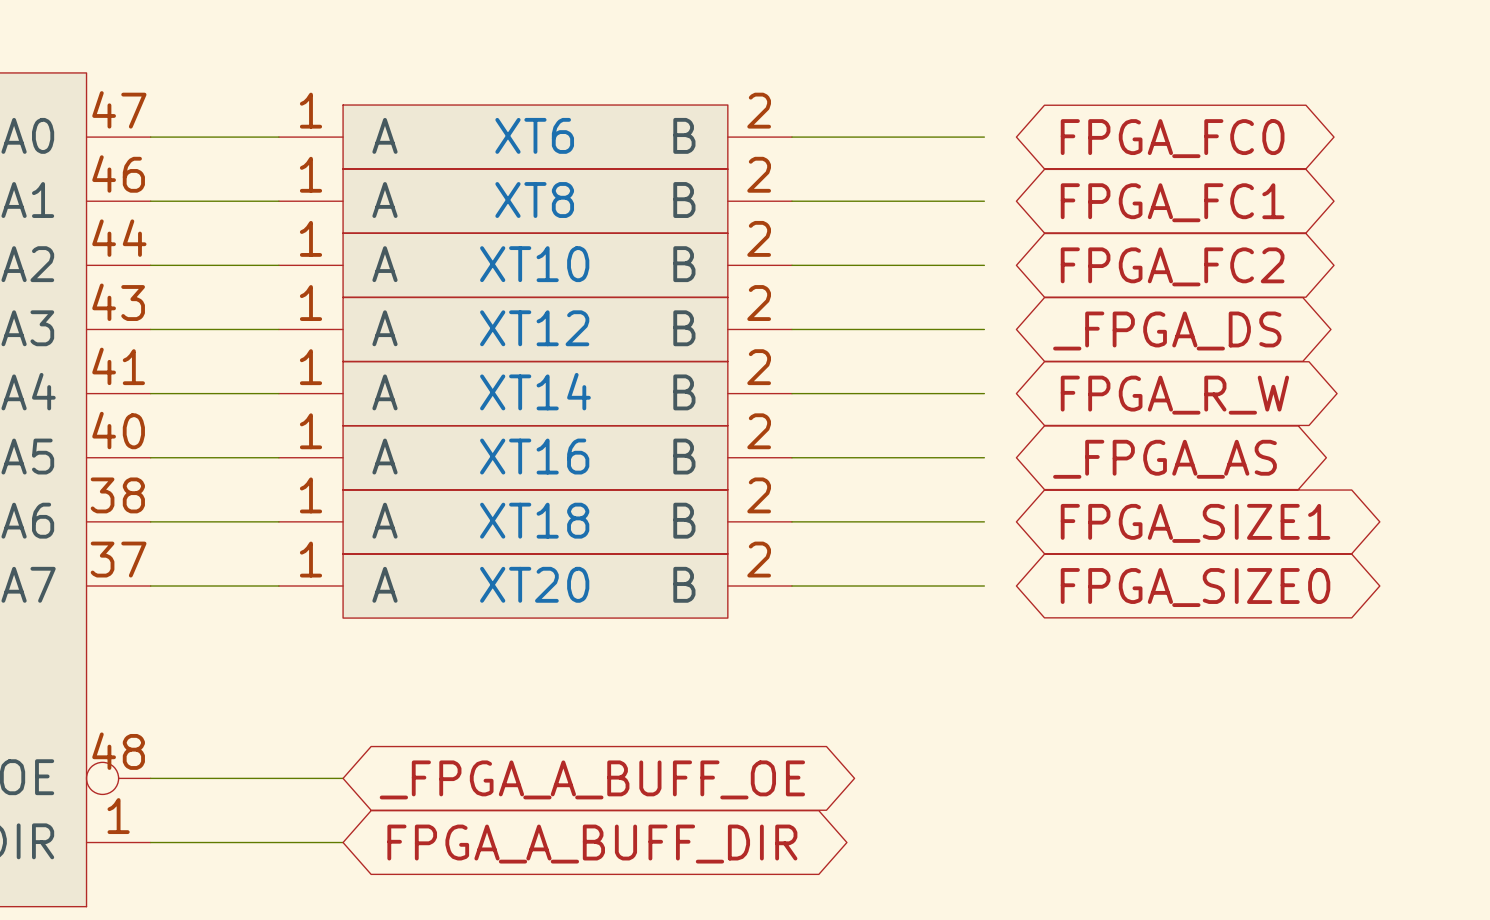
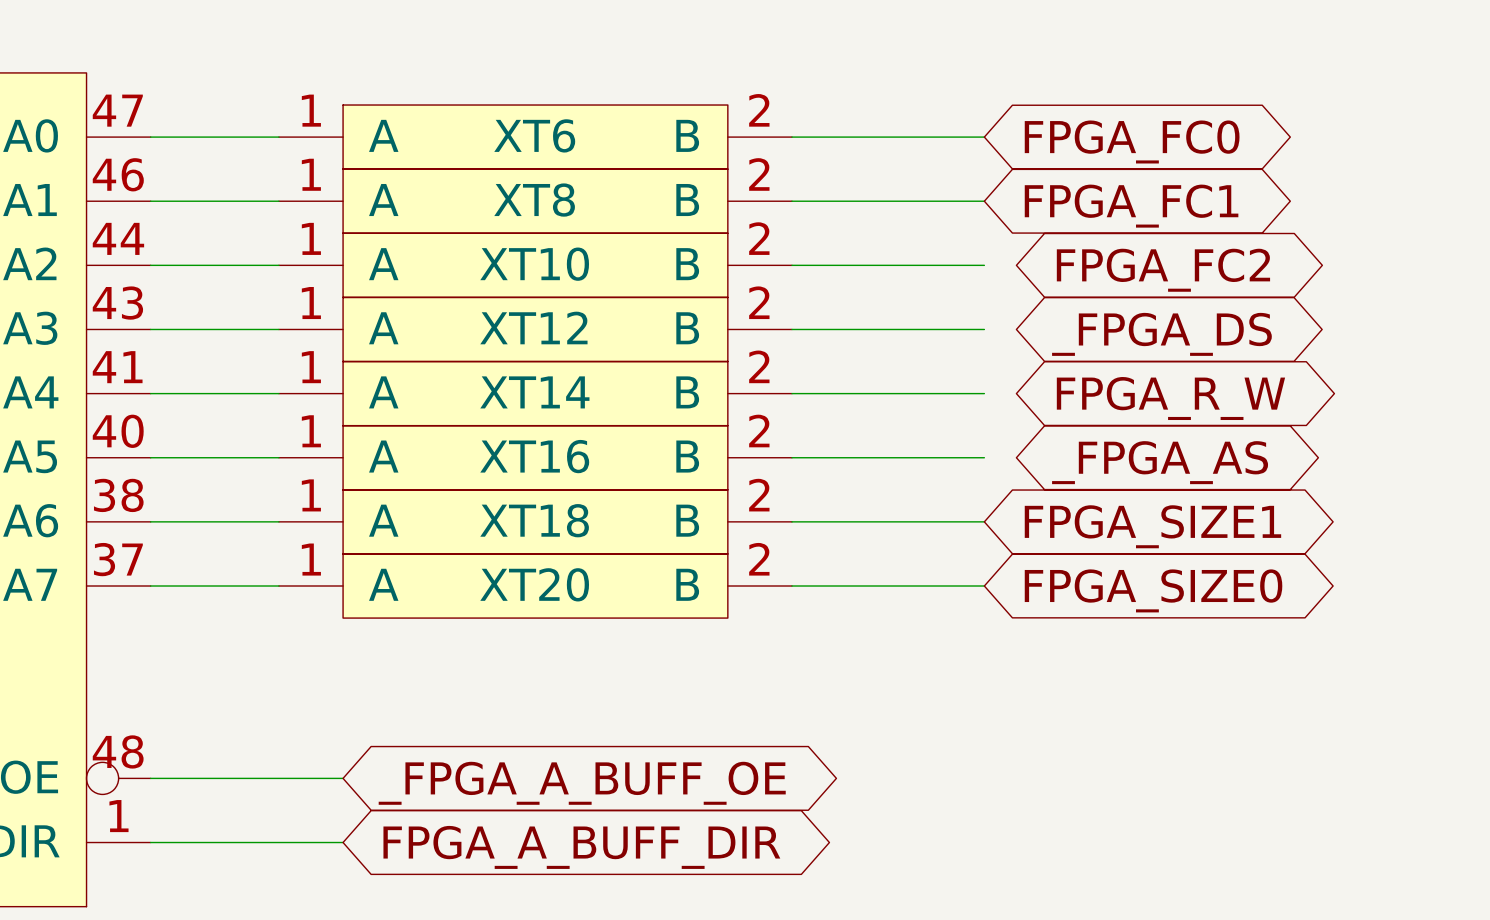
global label position: FPGA_FC0 (1172, 138) -> FPGA_FC0 (1132, 141)
global label position: FPGA_FC1 (1172, 202) -> FPGA_FC1 (1131, 206)
global label position: FPGA_SIZE1 (1195, 523) -> FPGA_SIZE1 (1152, 526)
global label position: FPGA_SIZE0 (1195, 587) -> FPGA_SIZE0 (1153, 590)

